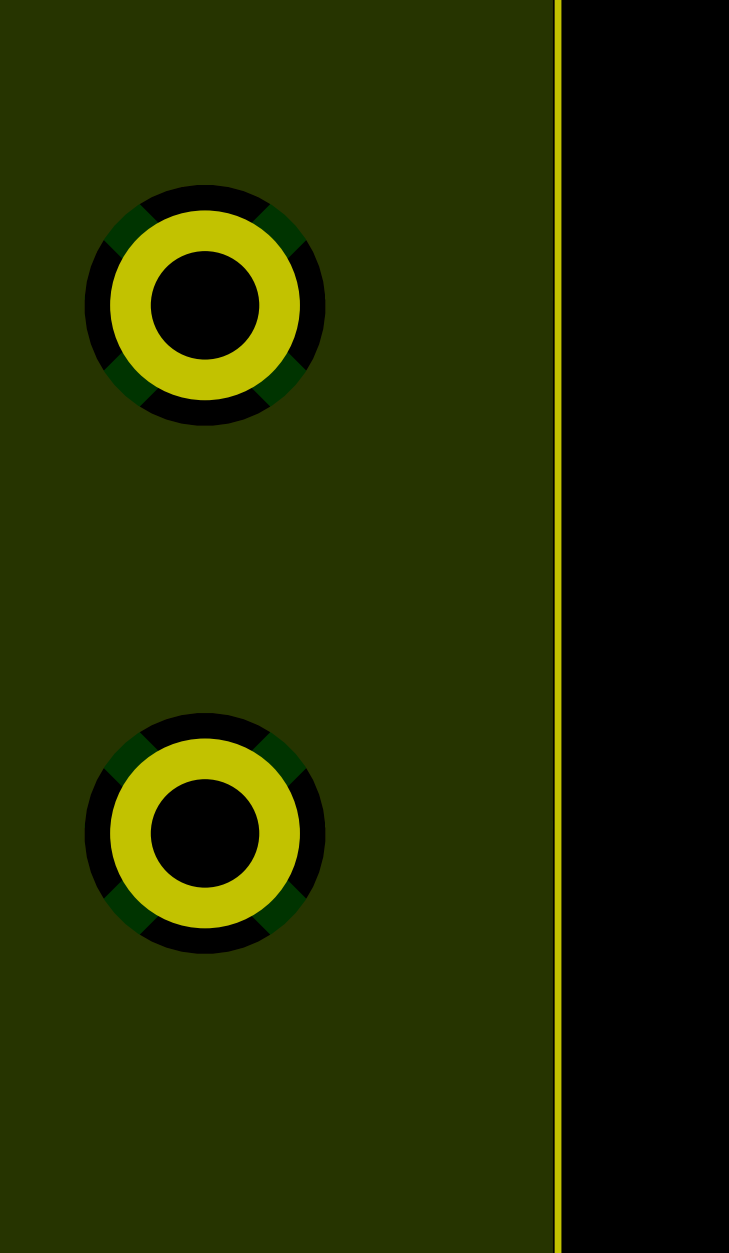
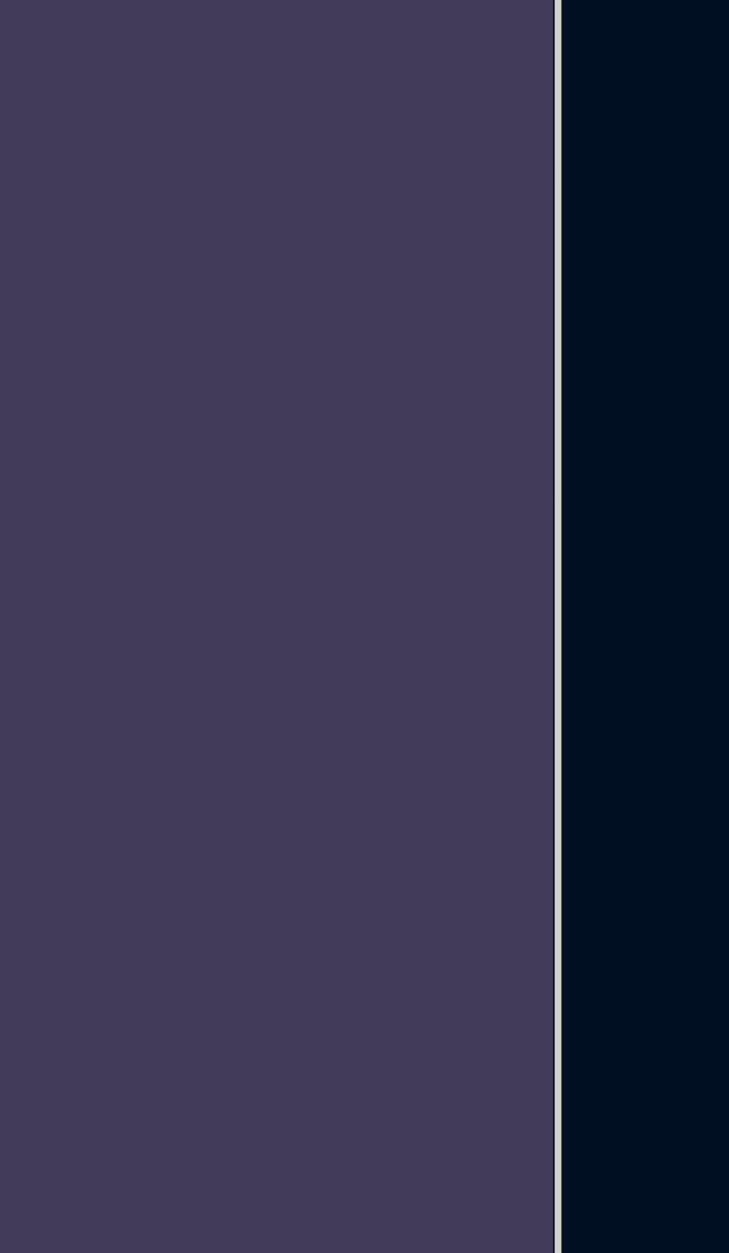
part: (205, 305) -> none
part: (205, 833) -> none

